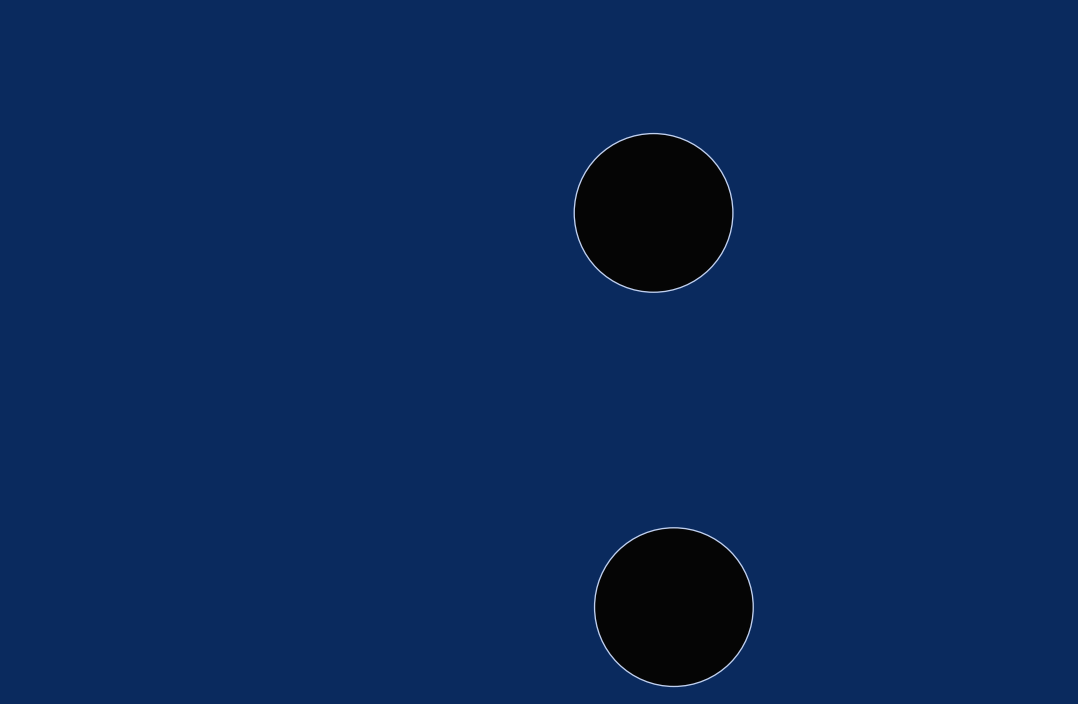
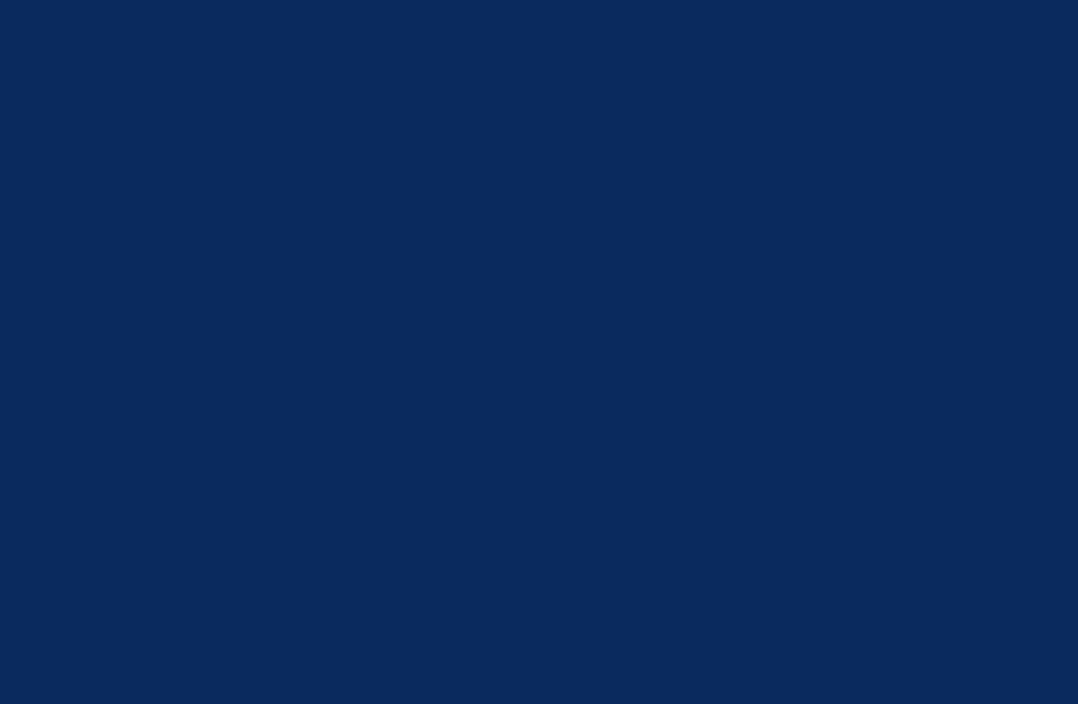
part: (653, 212) -> none
part: (673, 607) -> none

